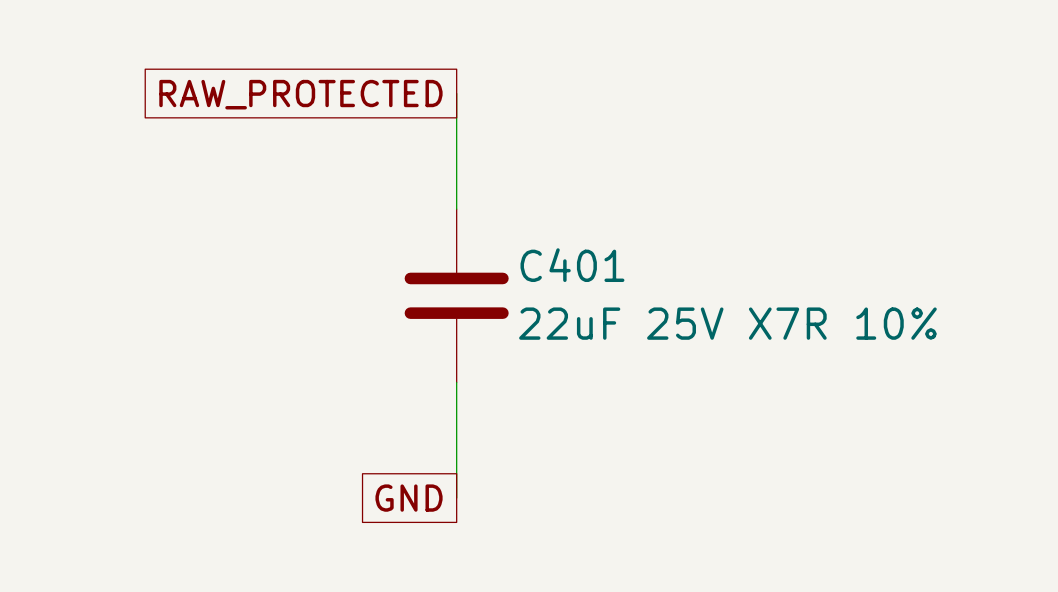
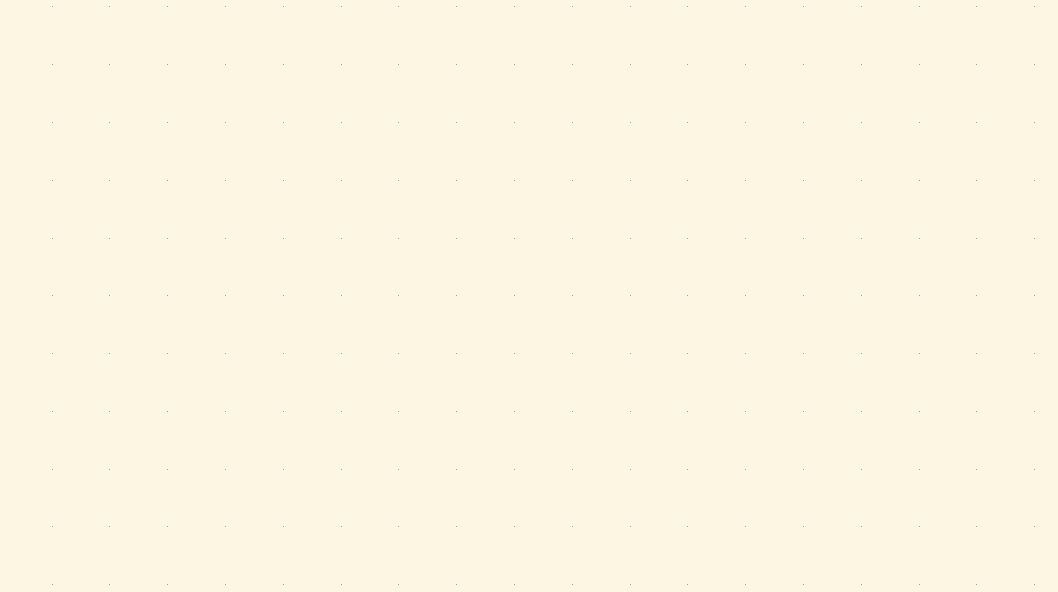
wire: (456, 93) (456, 209) -> none
global label: RAW_PROTECTED (300, 94) -> none
C401: 22uF 25V X7R 10% (456, 295) -> none
wire: (456, 382) (456, 498) -> none
global label: GND (409, 498) -> none

